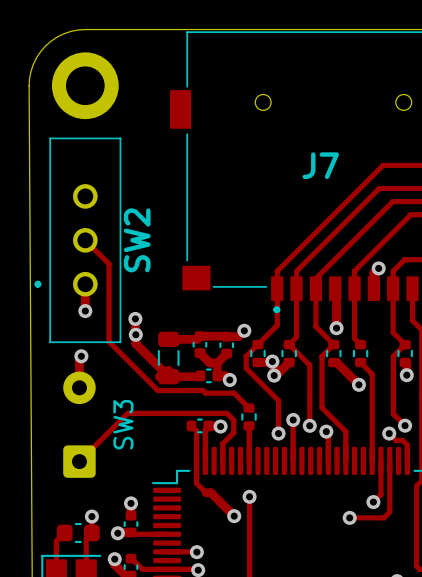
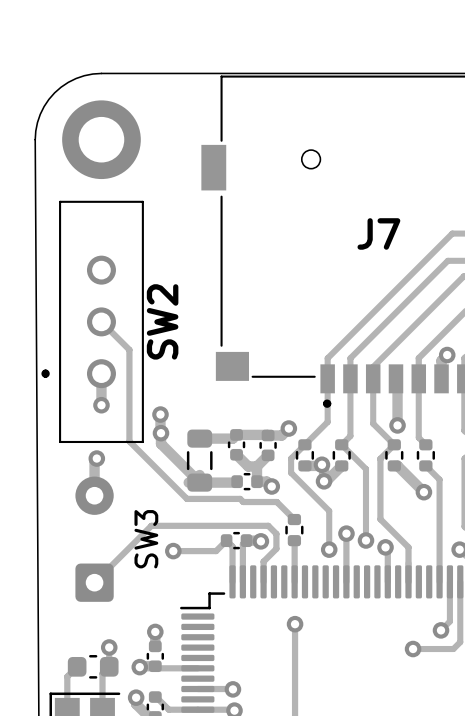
track: none -> (226, 540) (216, 551) (173, 551)
via: none -> (173, 551)
track: (196, 460) (196, 483) (206, 492) (210, 492) (234, 516) -> none
via: (234, 516) -> none

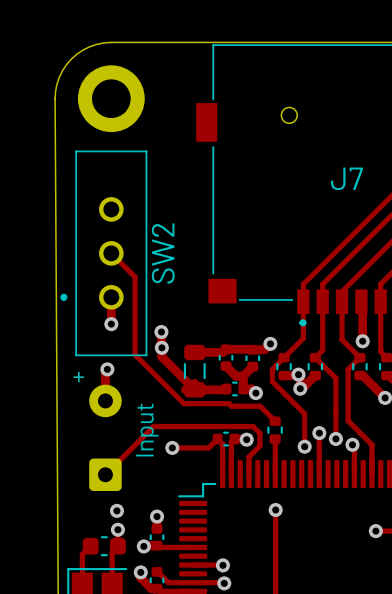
text: none -> + (78, 377)
text: none -> Input (147, 430)
SW3 name: SW3 (146, 539) -> none
via: none -> (116, 510)

